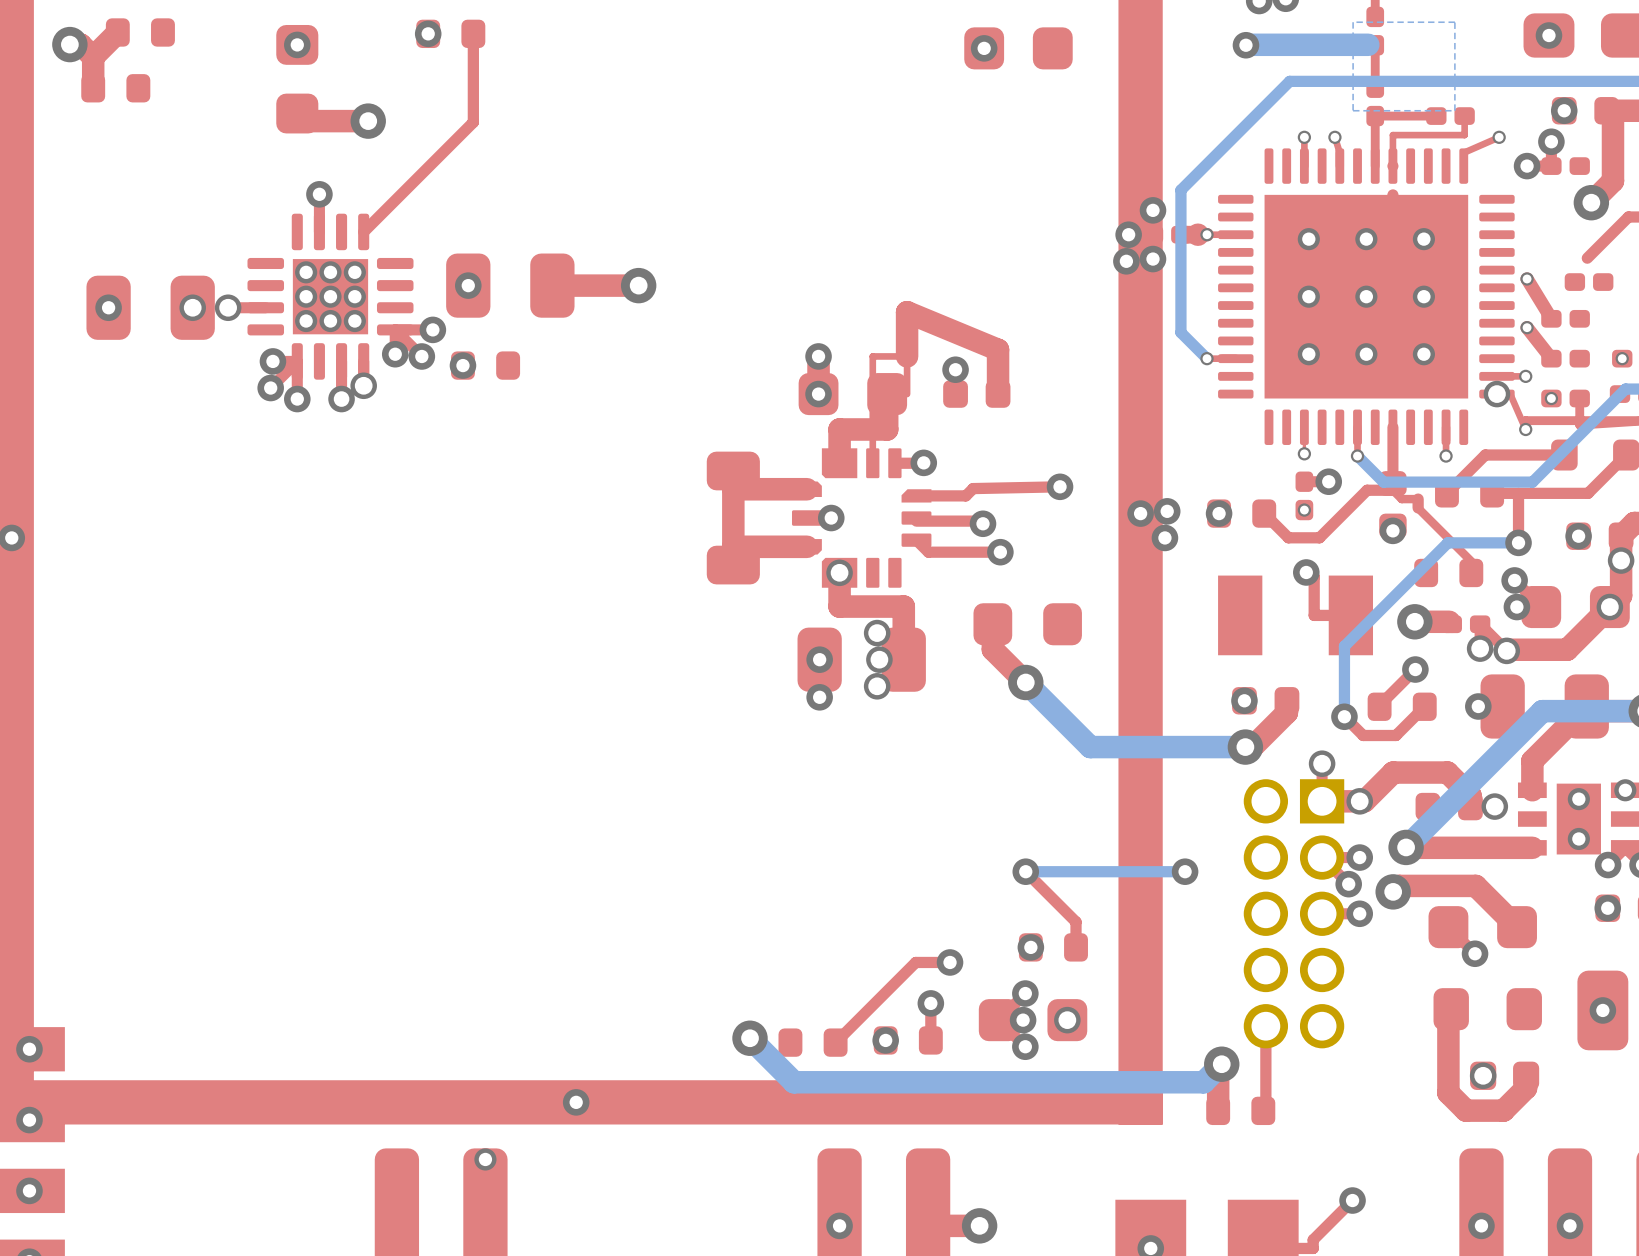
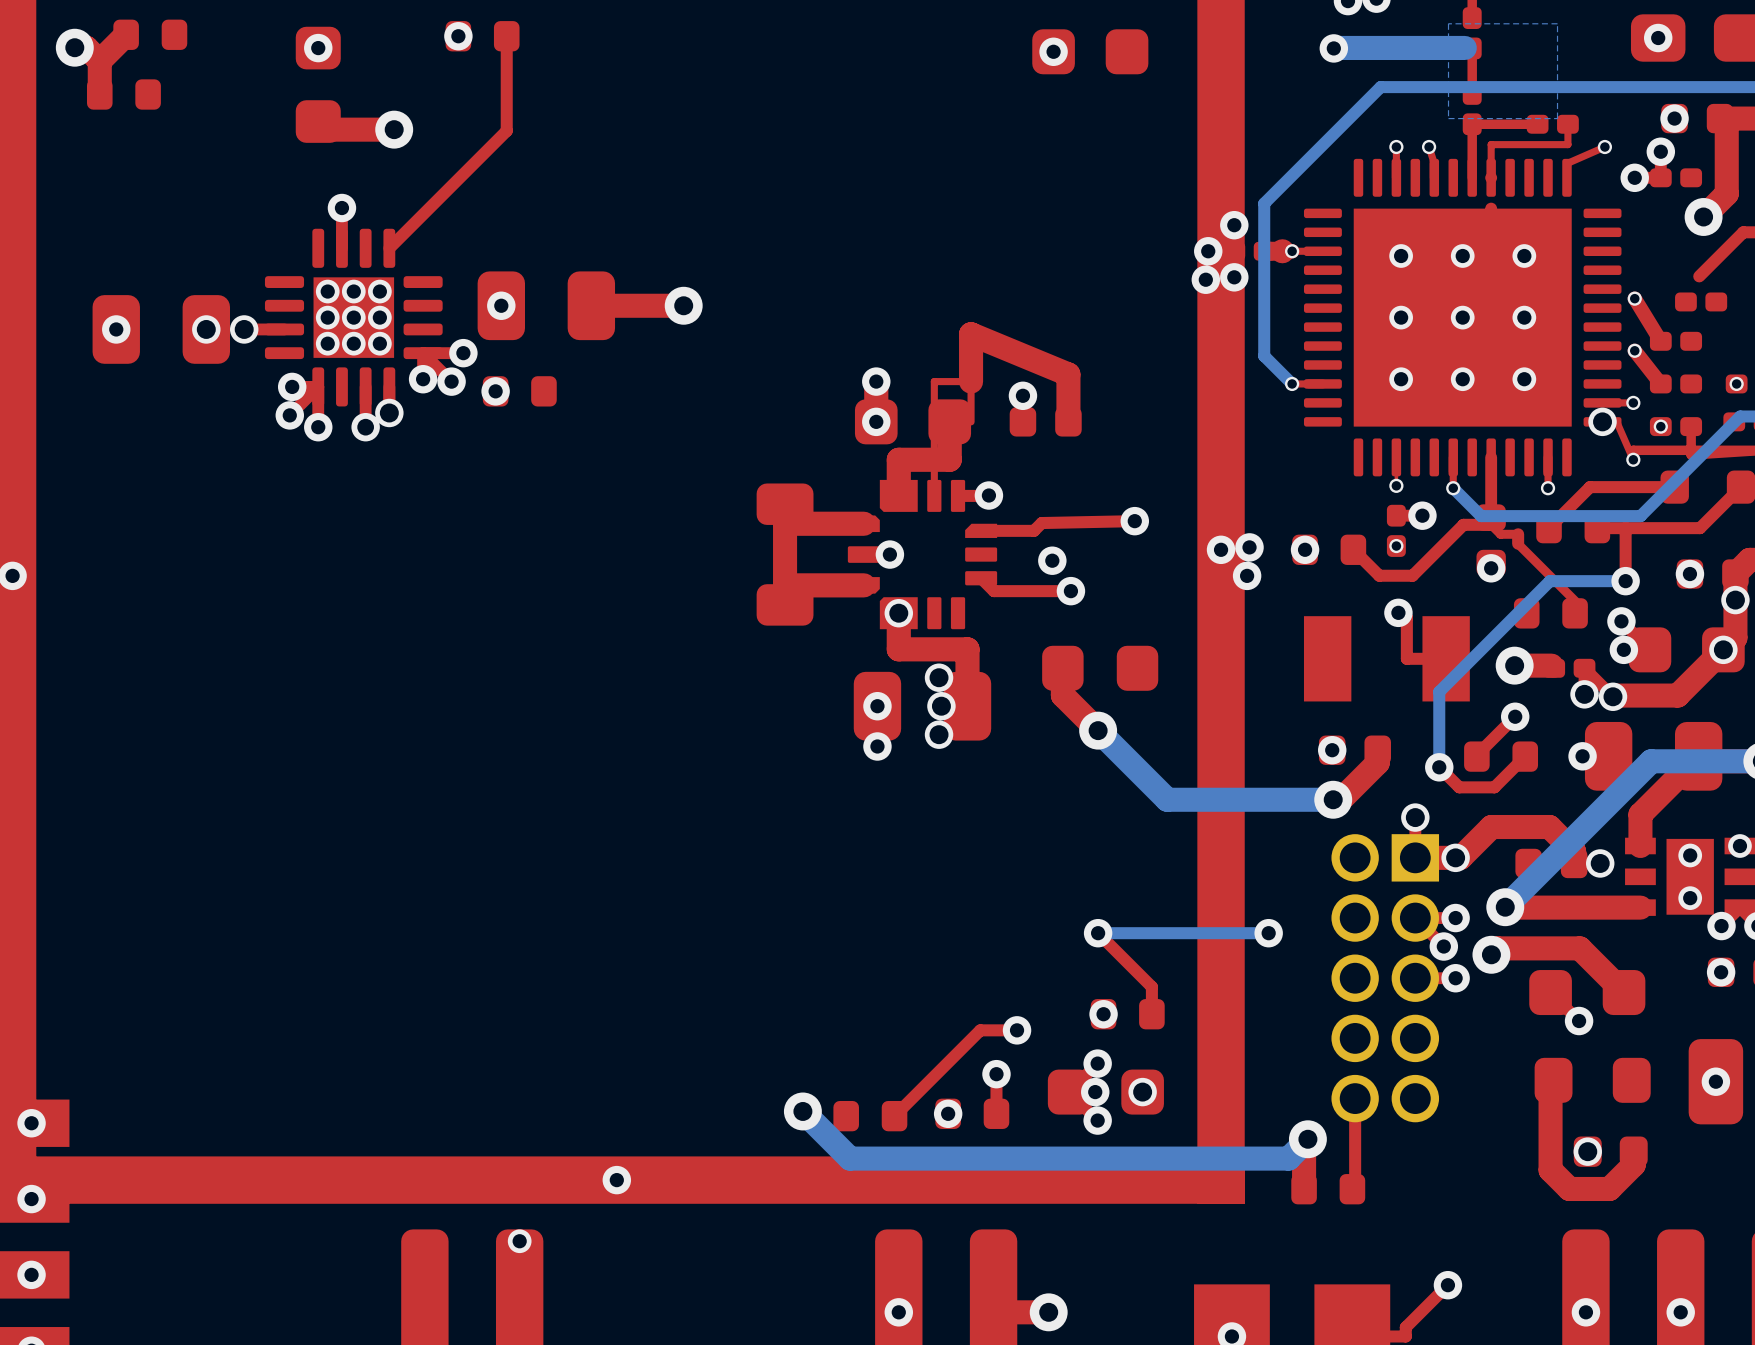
top track: (916, 521) (982, 521) (983, 523) -> none

